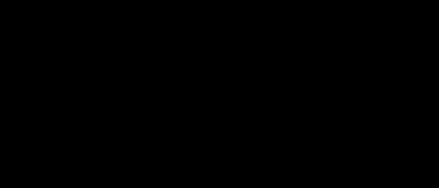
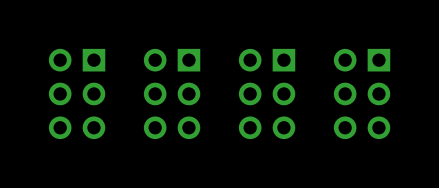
part: none -> (77, 93)
part: none -> (172, 93)
part: none -> (267, 93)
part: none -> (362, 93)

